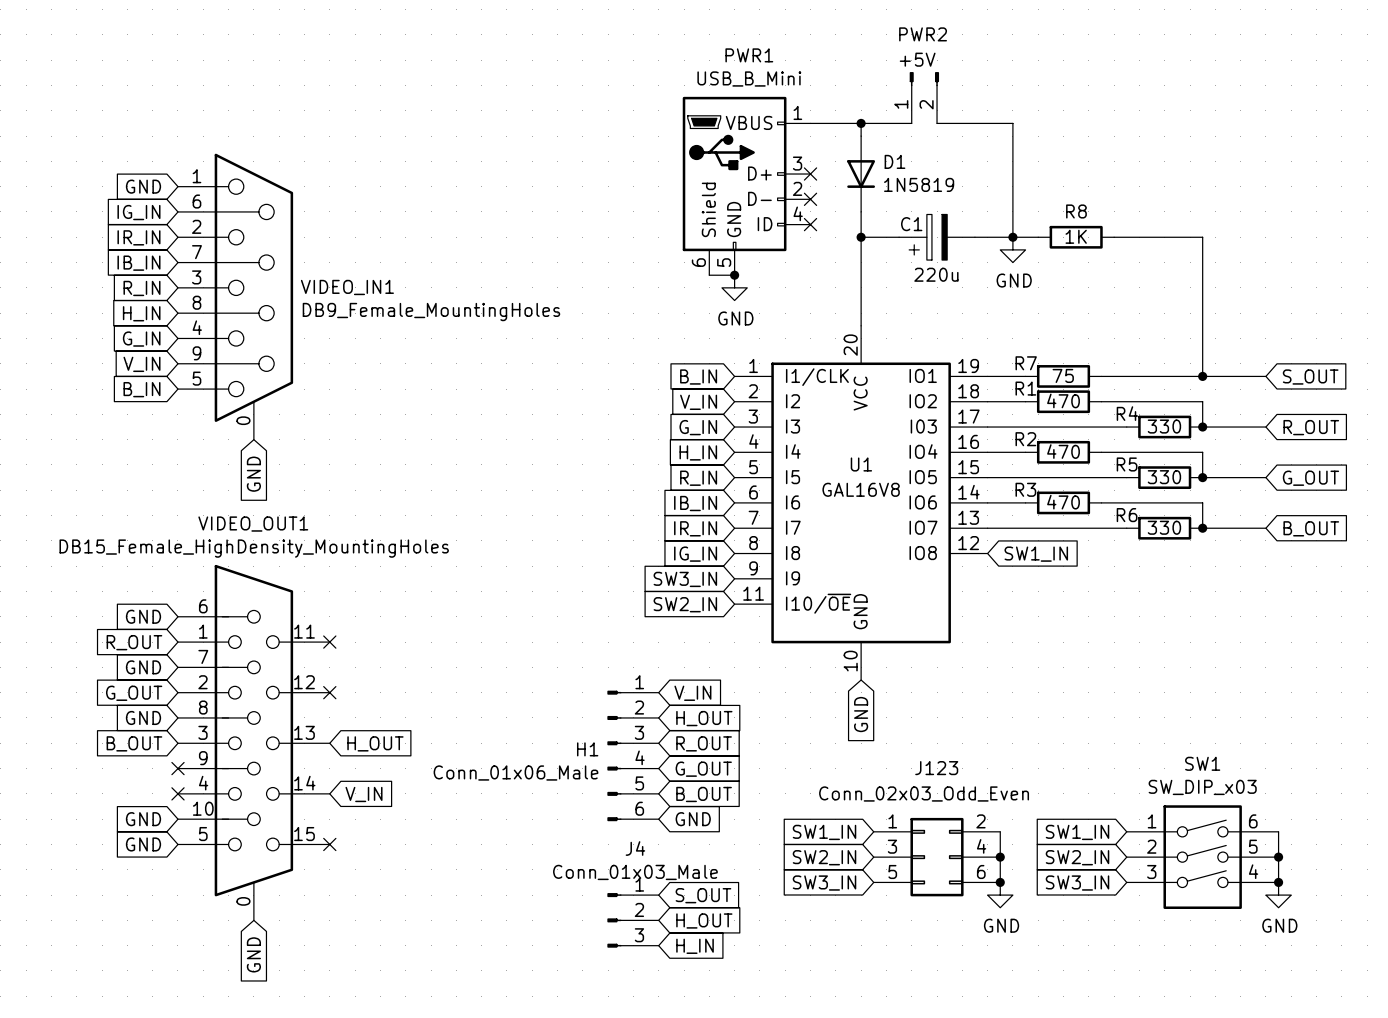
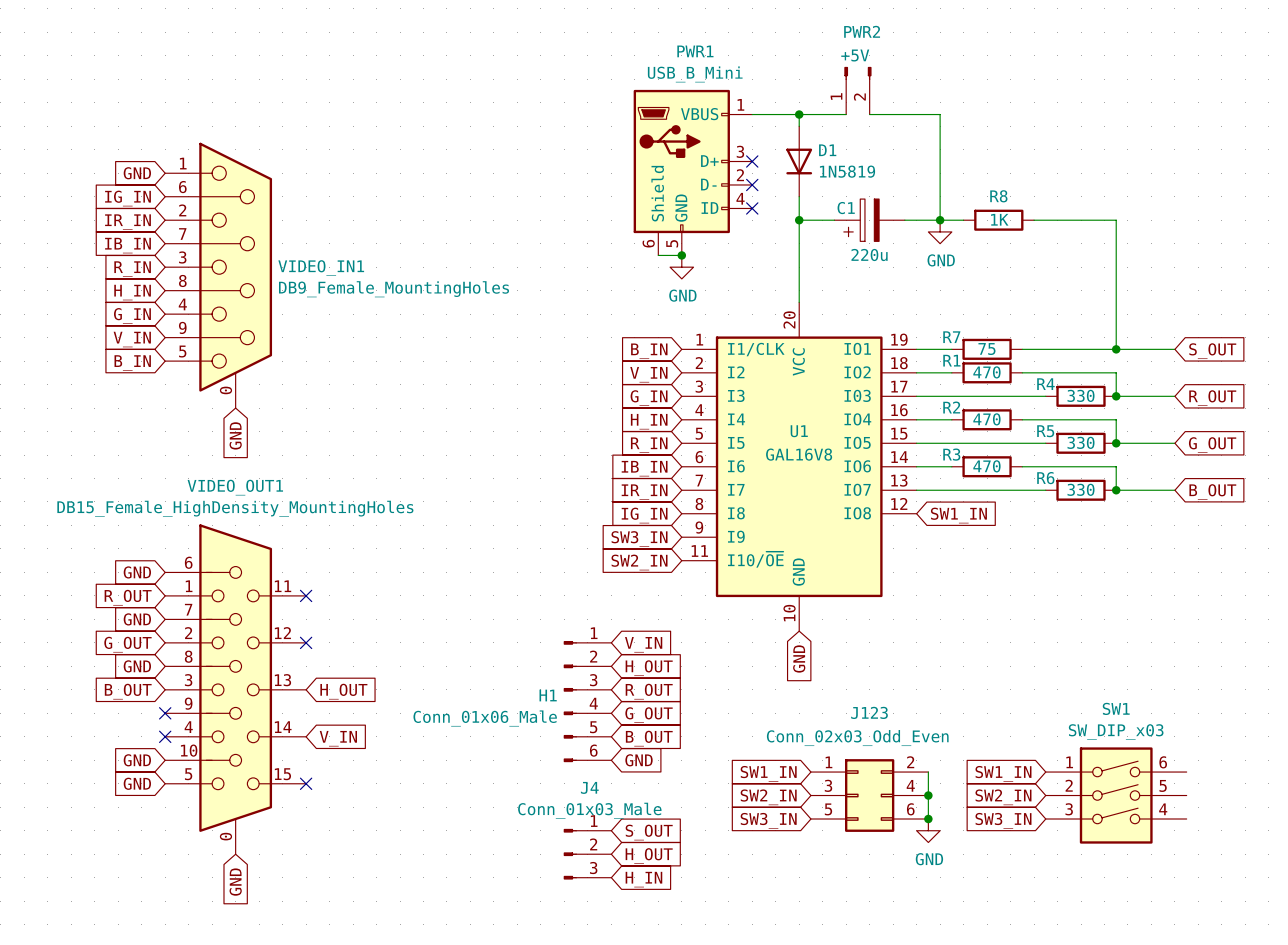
wire: (1278, 831) (1278, 882) -> none
junction: (1278, 857) -> none
junction: (1278, 882) -> none
power symbol: GND (1278, 895) -> none

